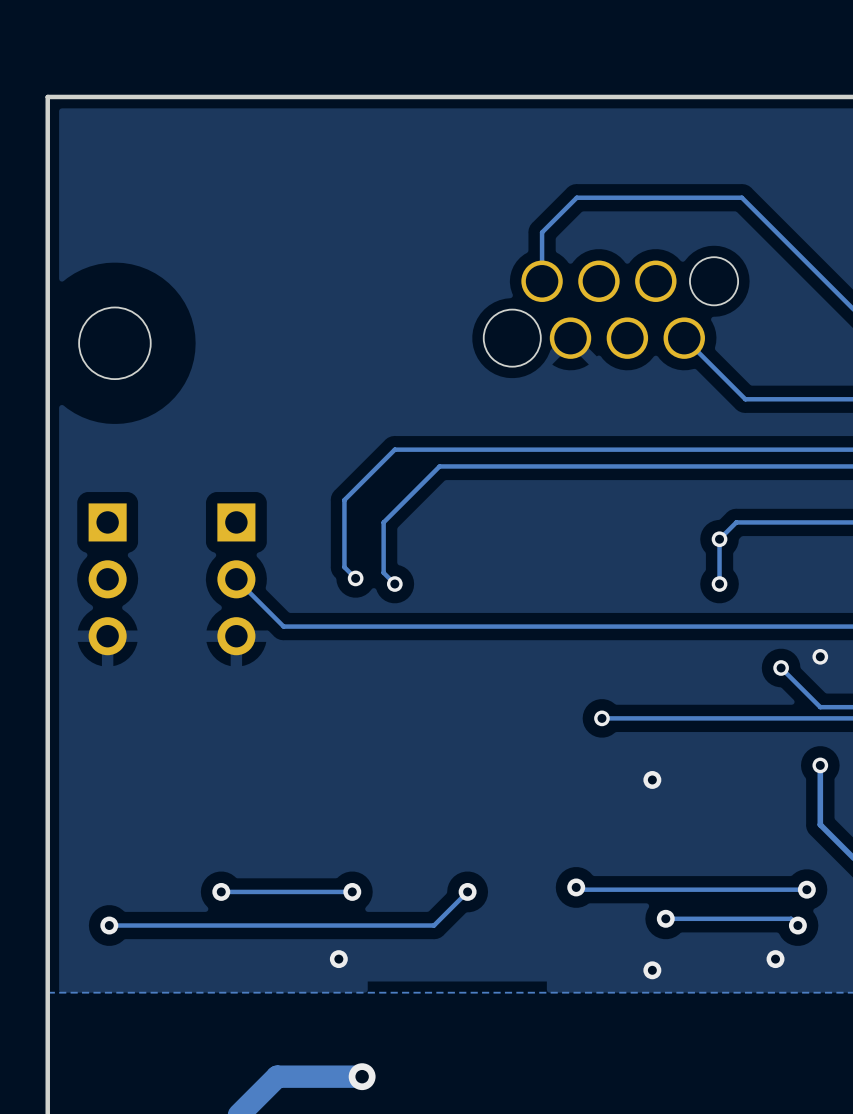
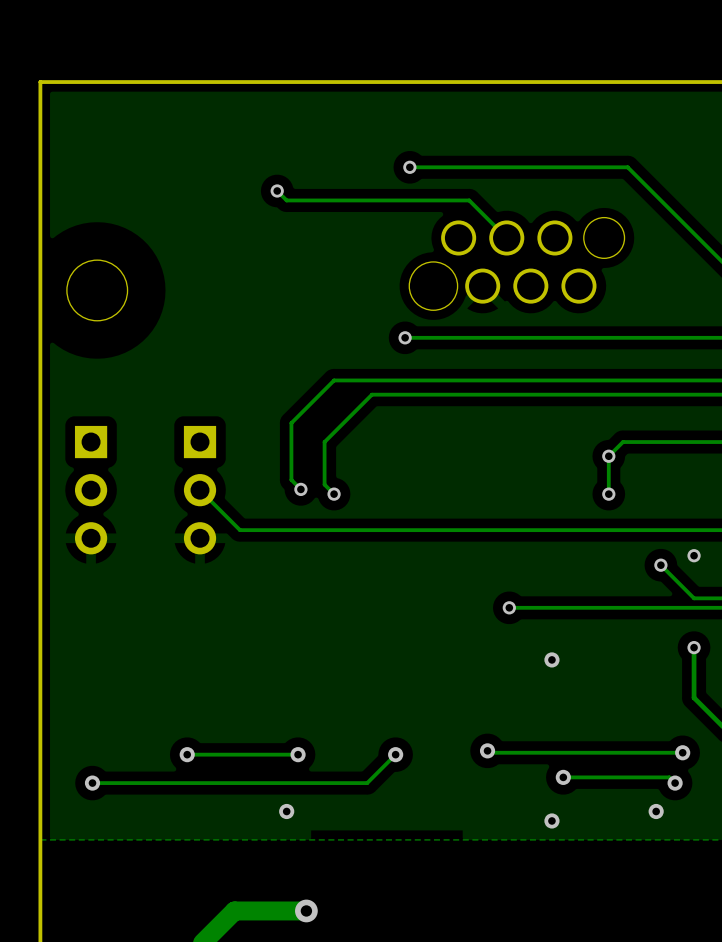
via: none -> (409, 167)
track: (576, 197) (542, 232) (542, 281) -> (488, 167) (409, 167)
track: none -> (277, 190) (286, 200) (469, 200) (506, 237)
via: none -> (277, 190)
track: (684, 338) (745, 399) -> (405, 337) (630, 337)
via: none -> (405, 337)

